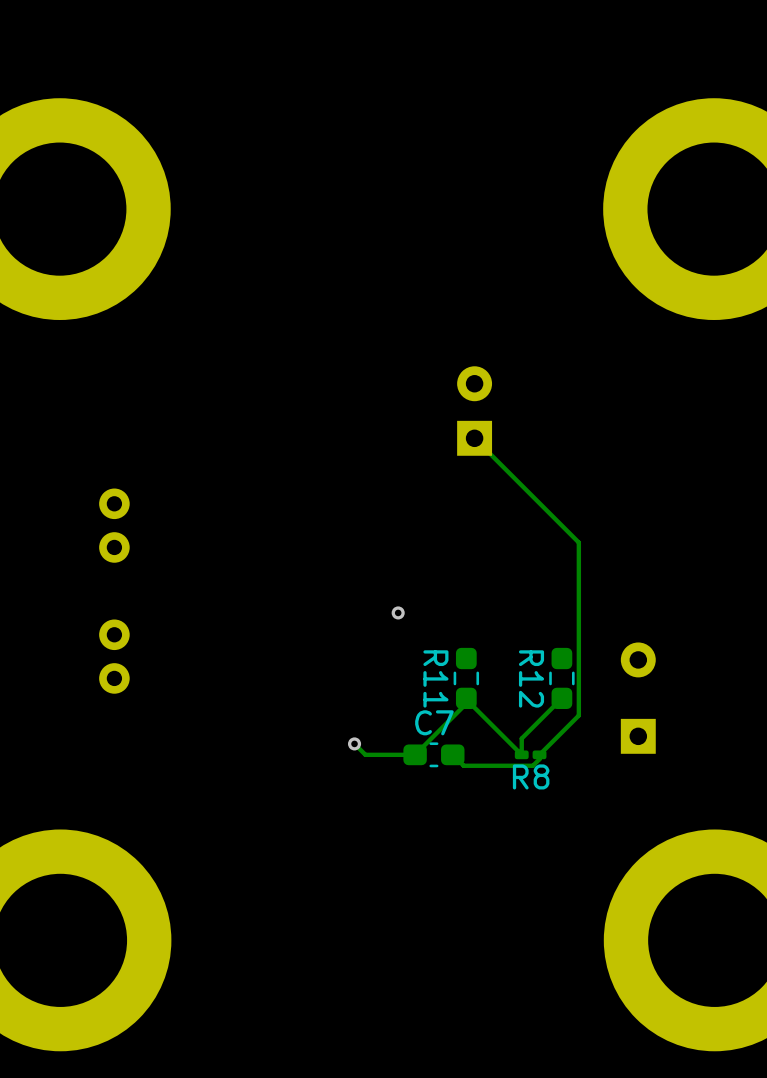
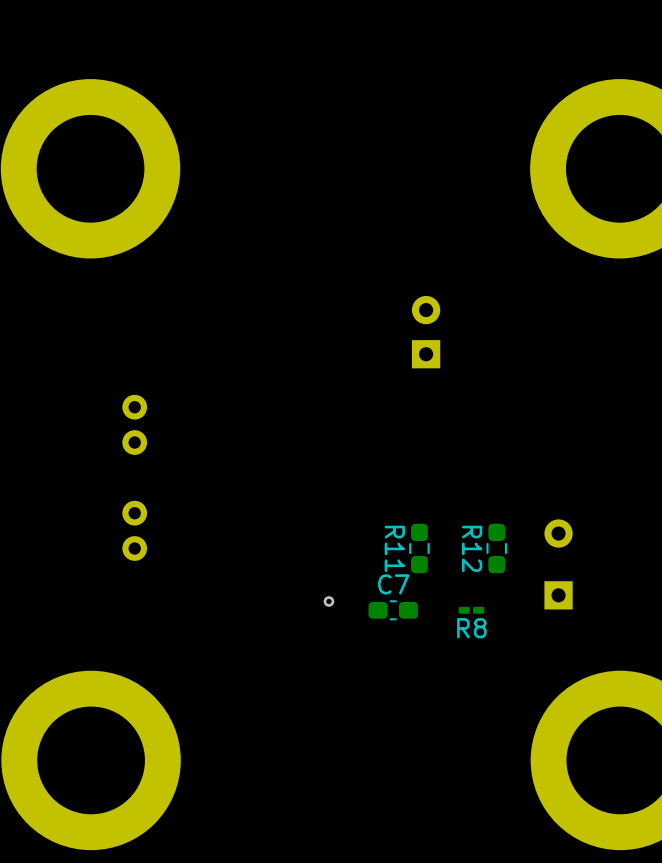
track: (474, 438) (578, 542) (578, 715) (539, 754) (539, 759) (532, 765) (463, 765) (452, 754) -> none
via: (398, 612) -> none
track: (466, 698) (466, 703) (415, 754) (365, 754) (354, 743) -> none
track: (561, 698) (521, 738) (521, 754) (466, 699) -> none

